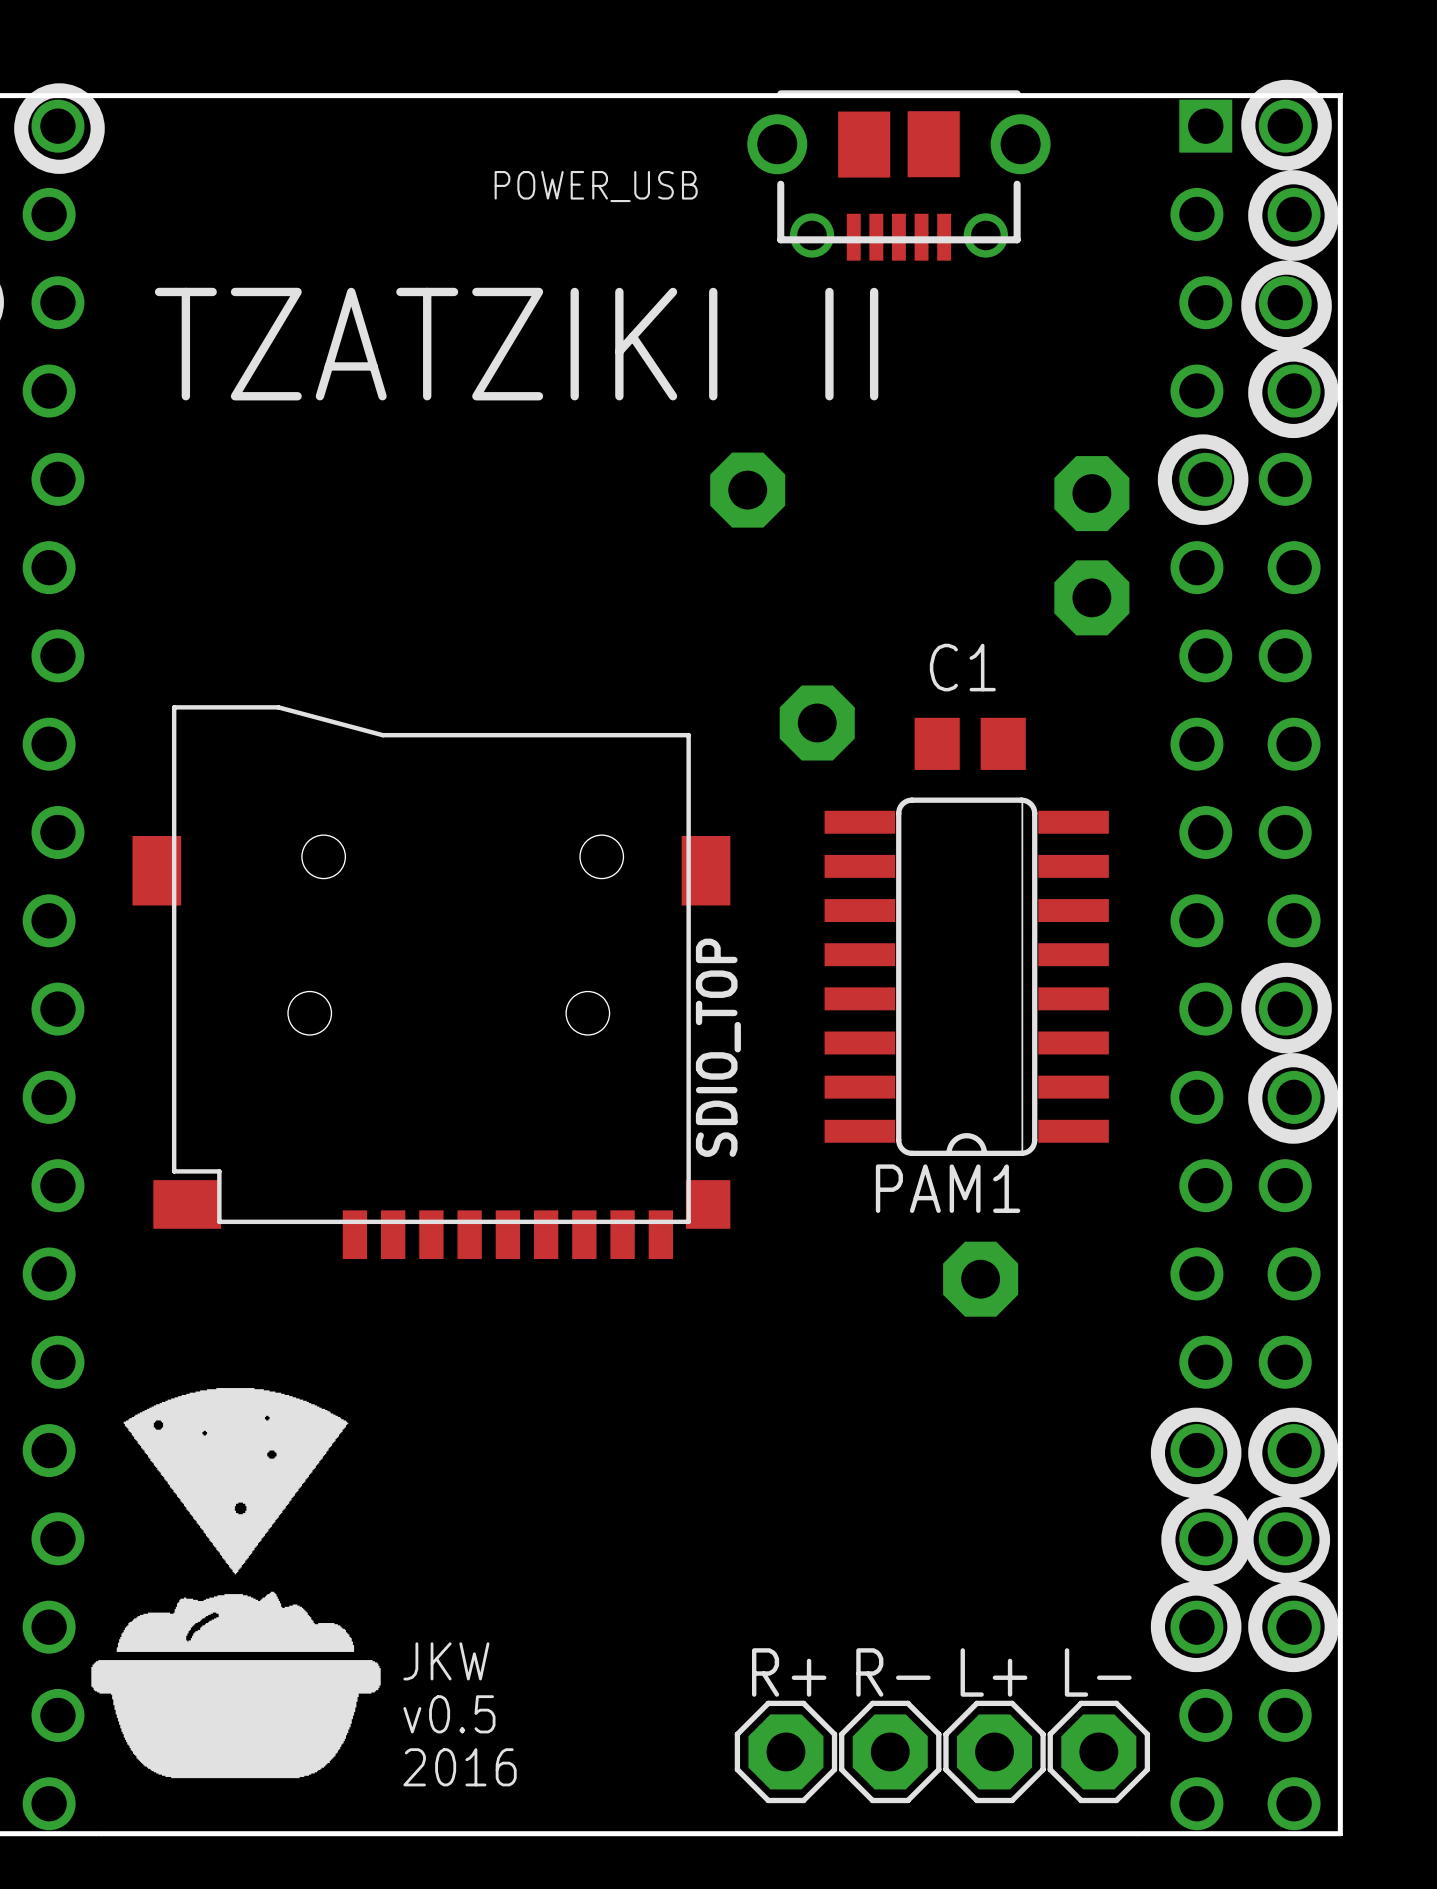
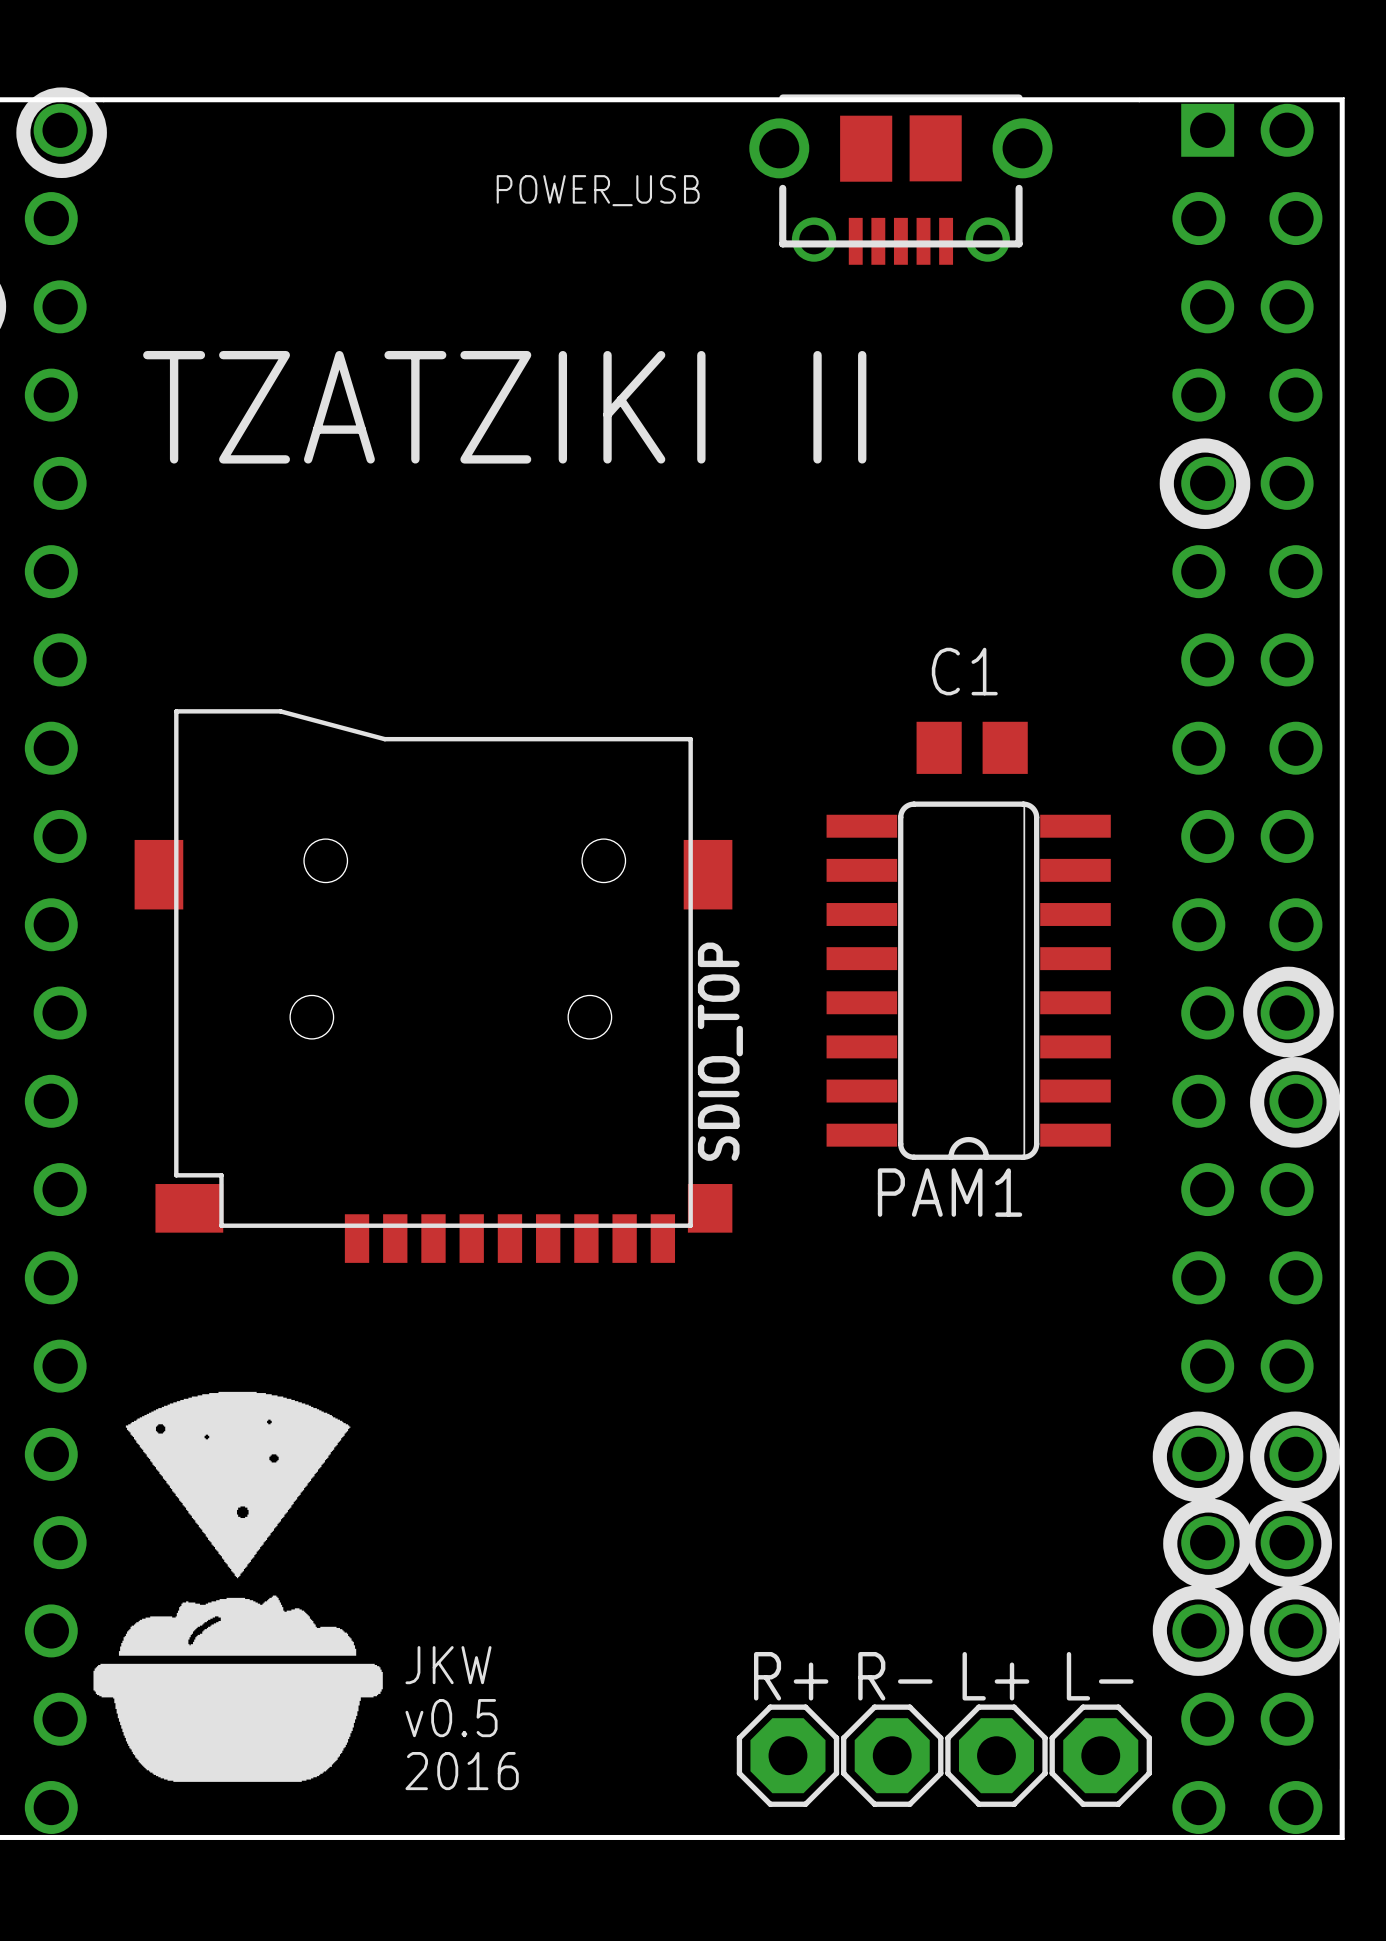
drawing: [1241, 79, 1339, 439] -> none
text position: TZATZIKI II (516, 344) -> TZATZIKI II (504, 407)
part: (747, 490) -> none
part: (1091, 493) -> none
part: (1091, 597) -> none
part: (817, 723) -> none
part: (980, 1279) -> none

